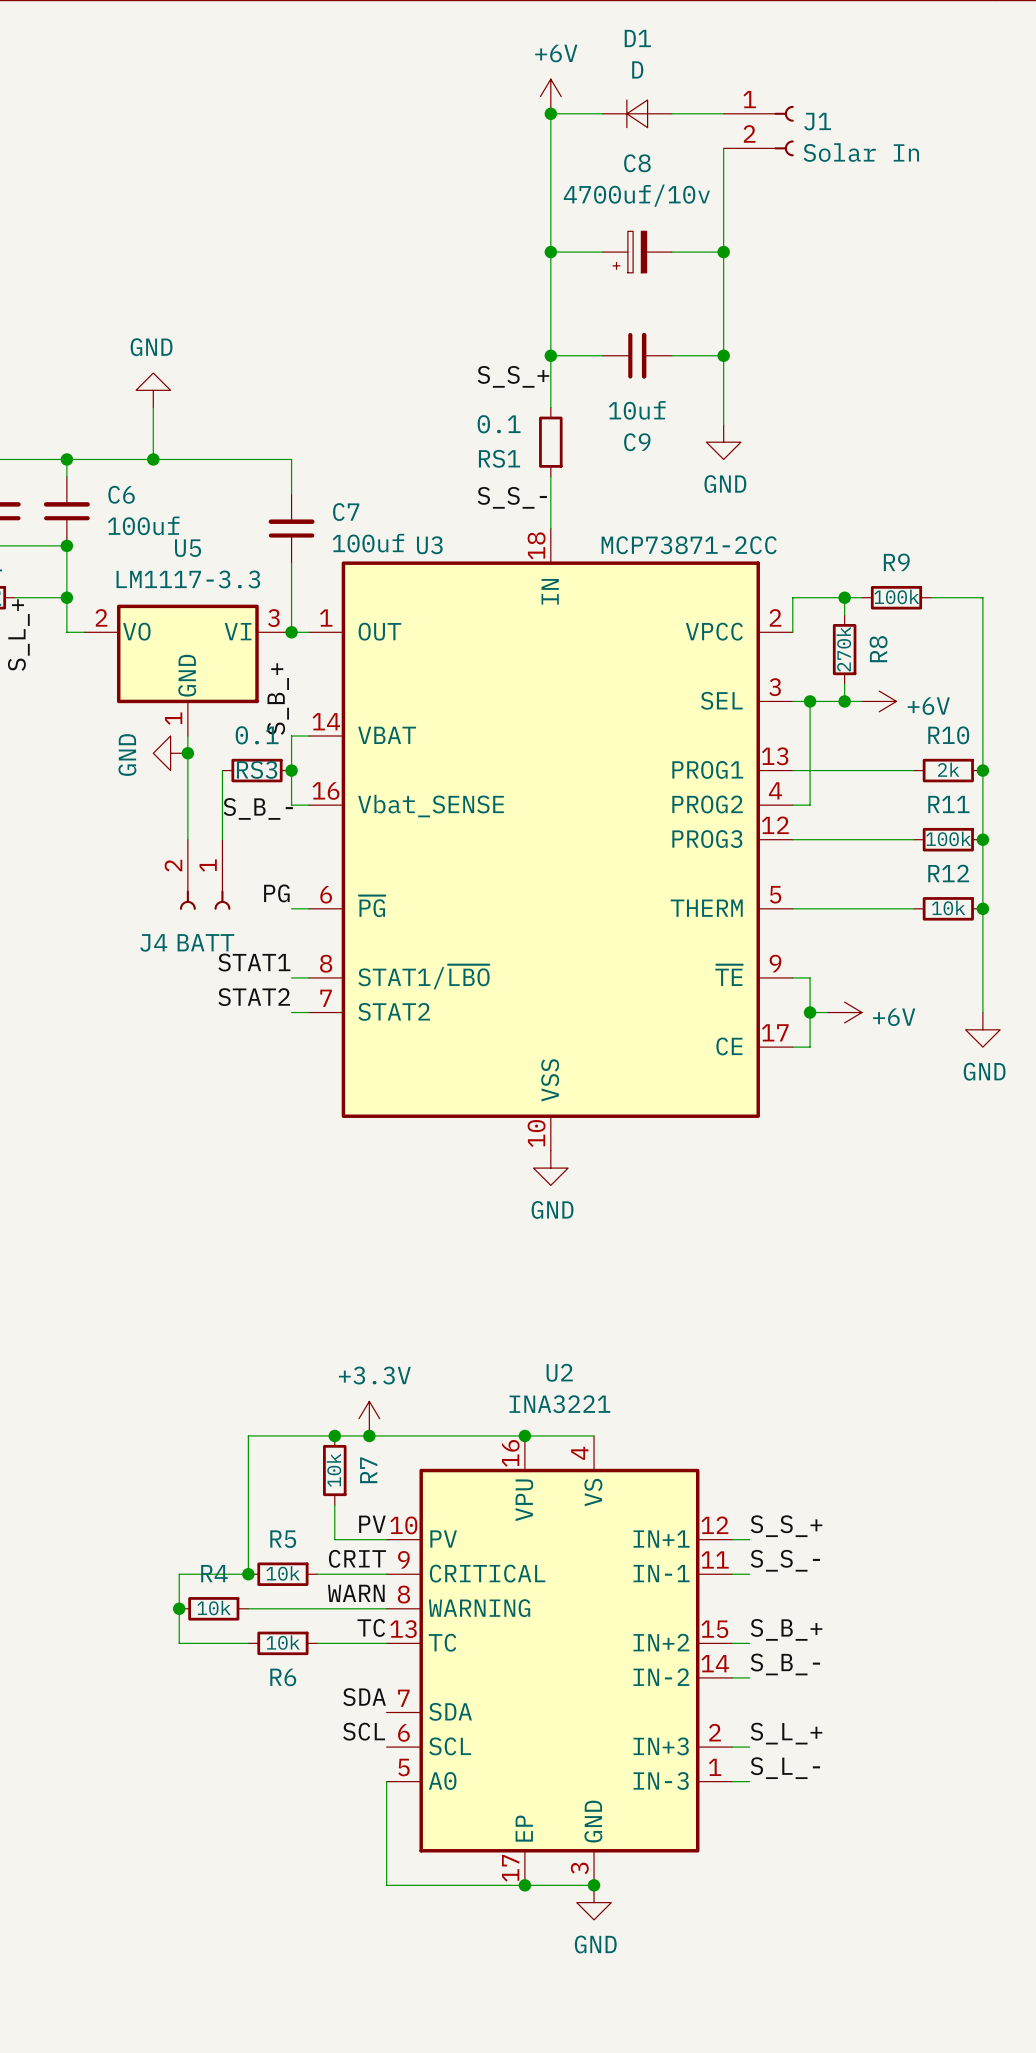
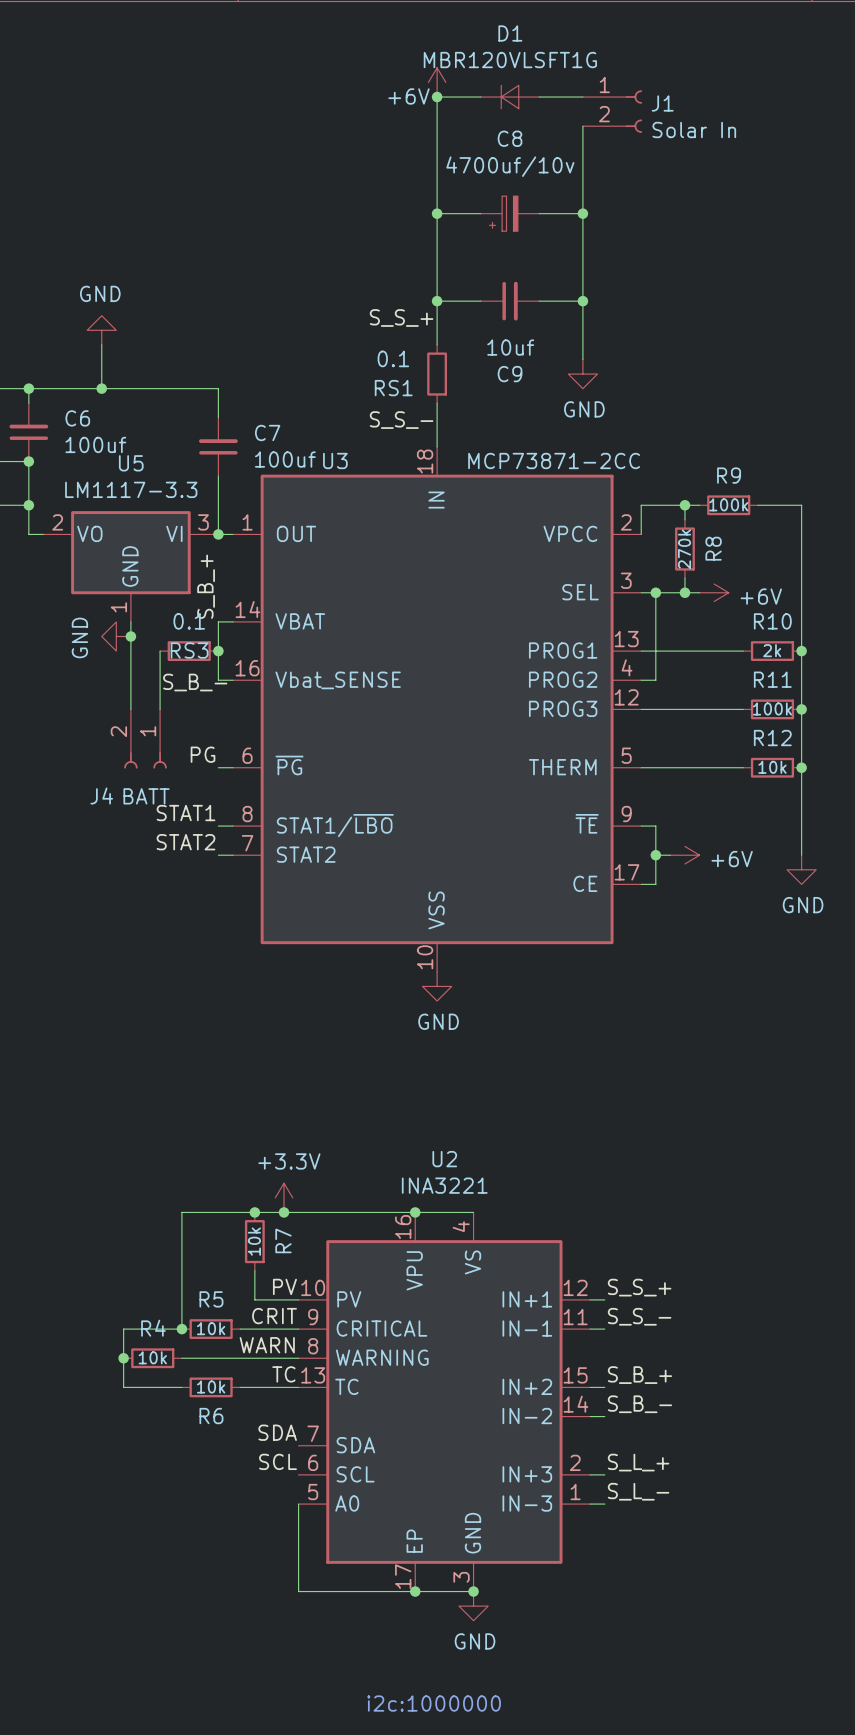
power symbol text position: +6V (556, 53) -> +6V (408, 96)
D1 value: D (637, 69) -> MBR120VLSFT1G (510, 60)
text: none -> i2c:1000000 (434, 1703)

